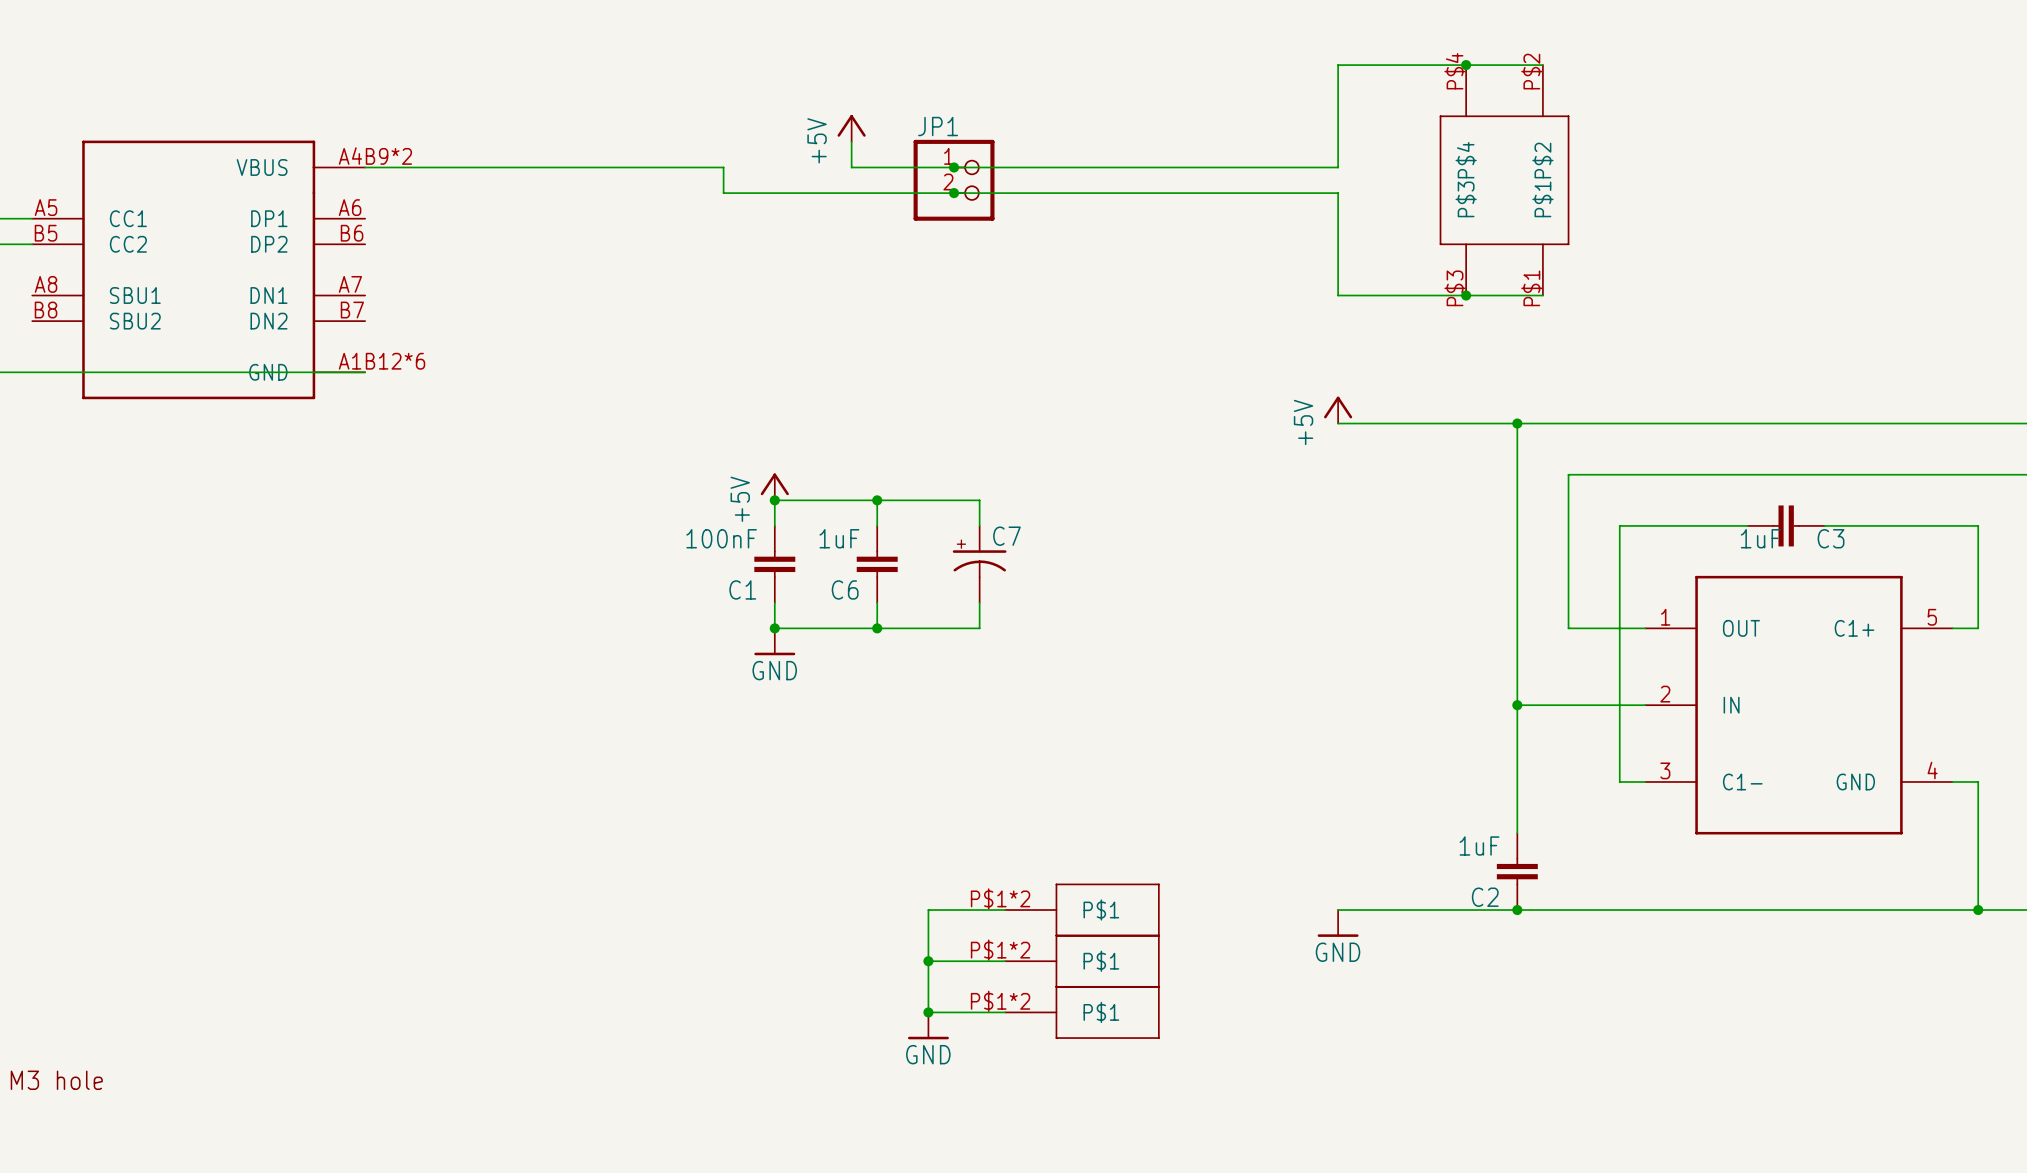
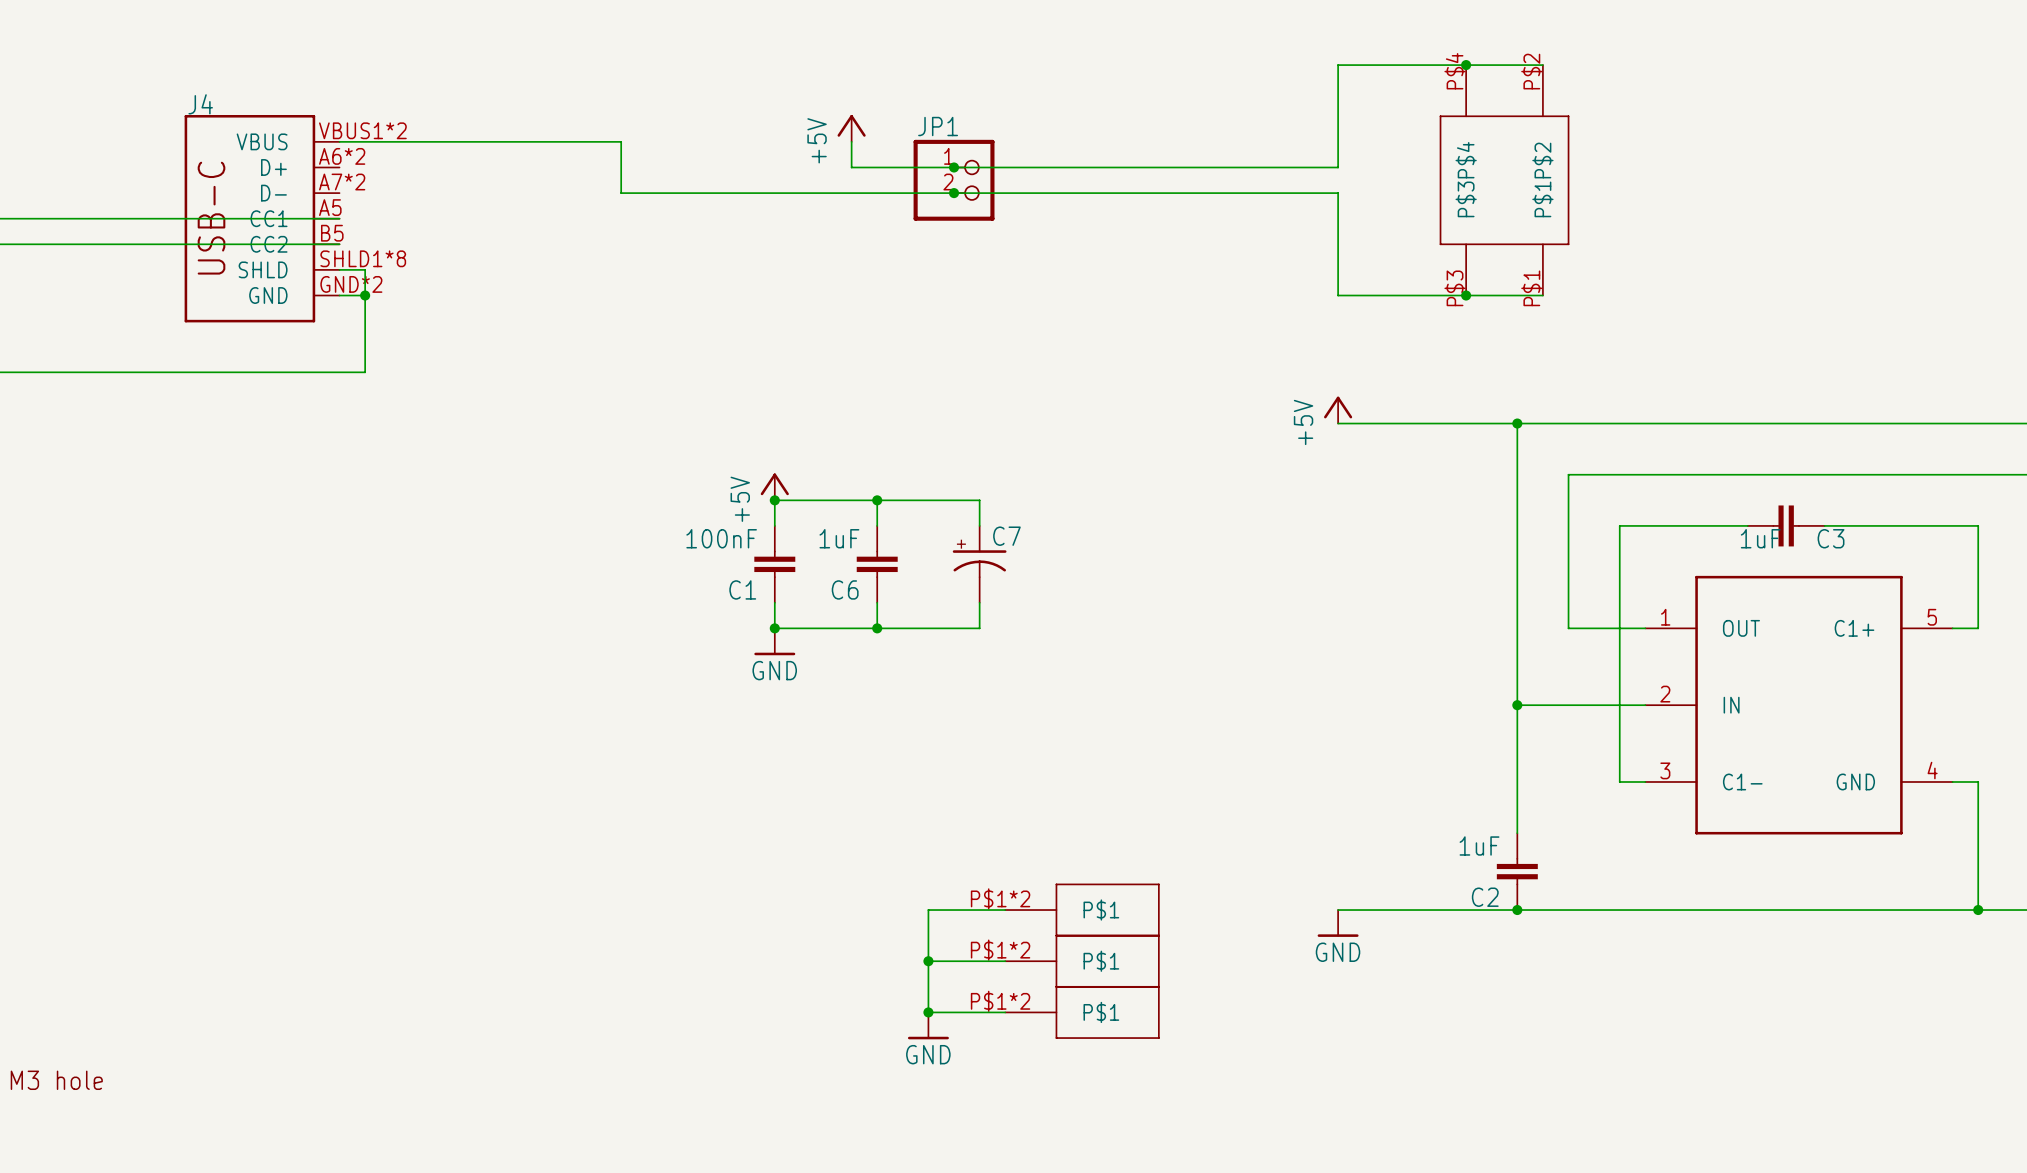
wire: (365, 167) (723, 167) (723, 193) -> (339, 141) (621, 141) (621, 193) (723, 193)
wire: none -> (32, 218) (339, 218)
J4: none -> (262, 218)
wire: none -> (32, 244) (339, 244)
part: (198, 269) -> none
wire: none -> (339, 269) (365, 269) (365, 372)
junction: none -> (365, 295)

